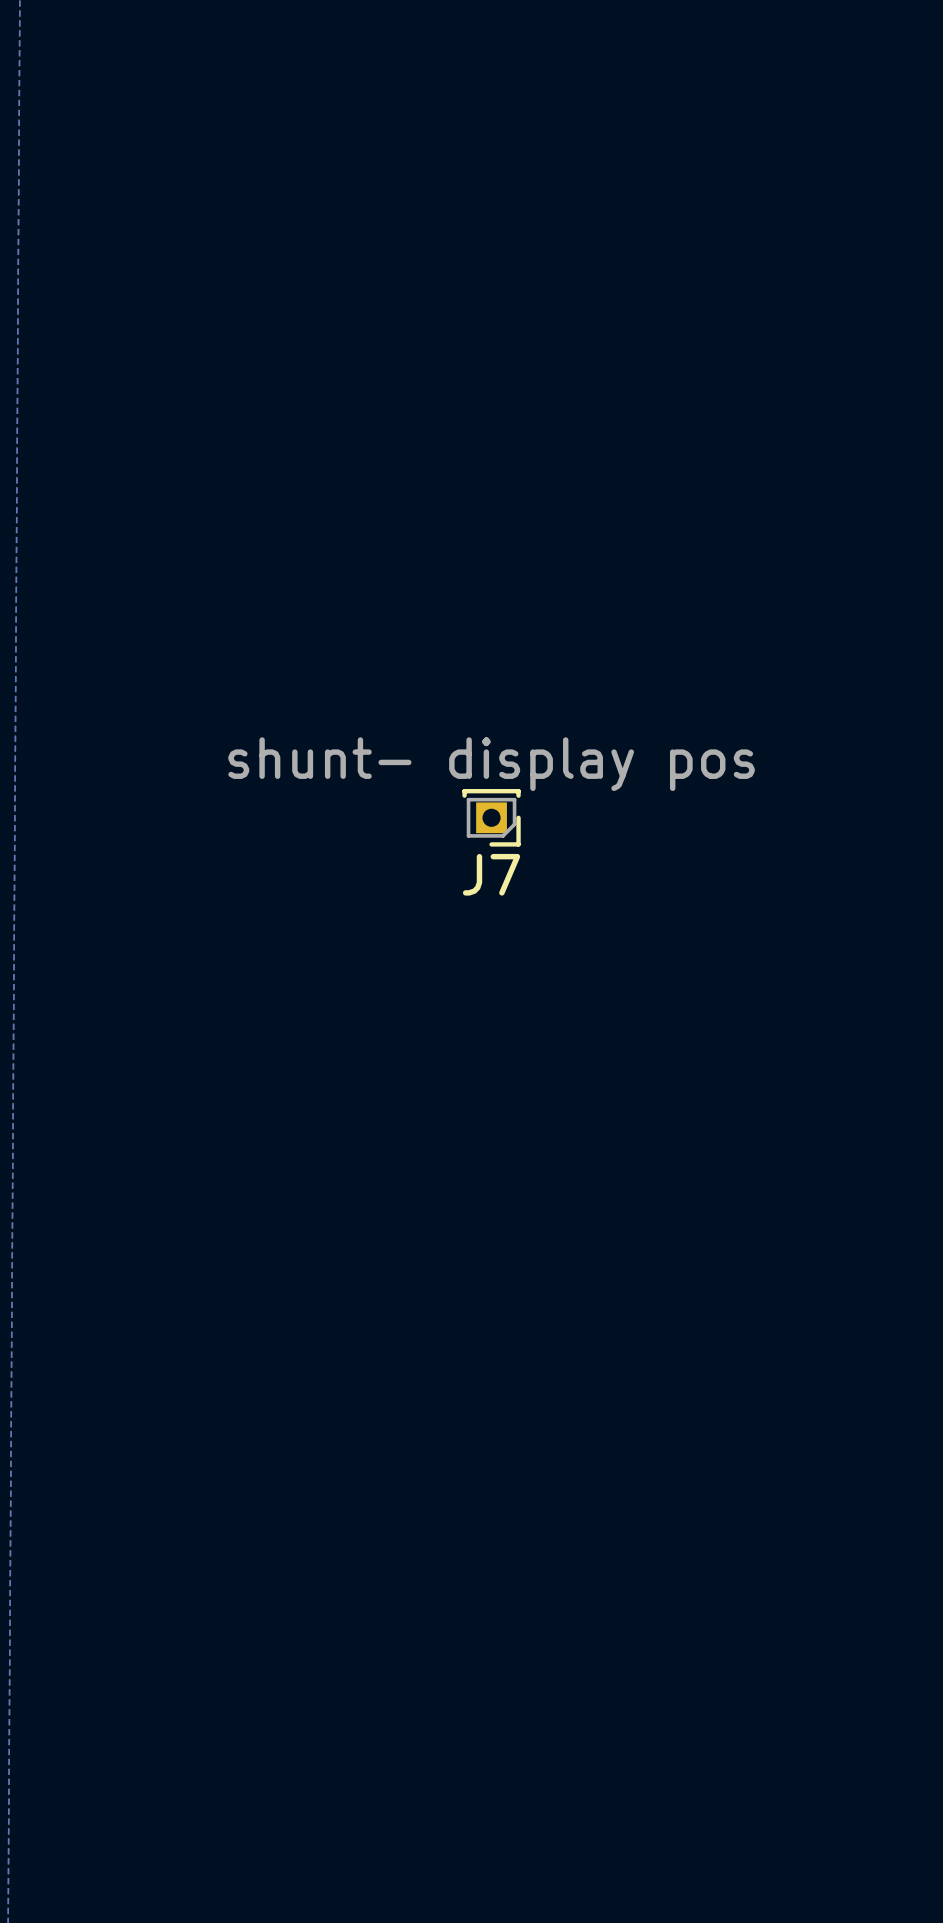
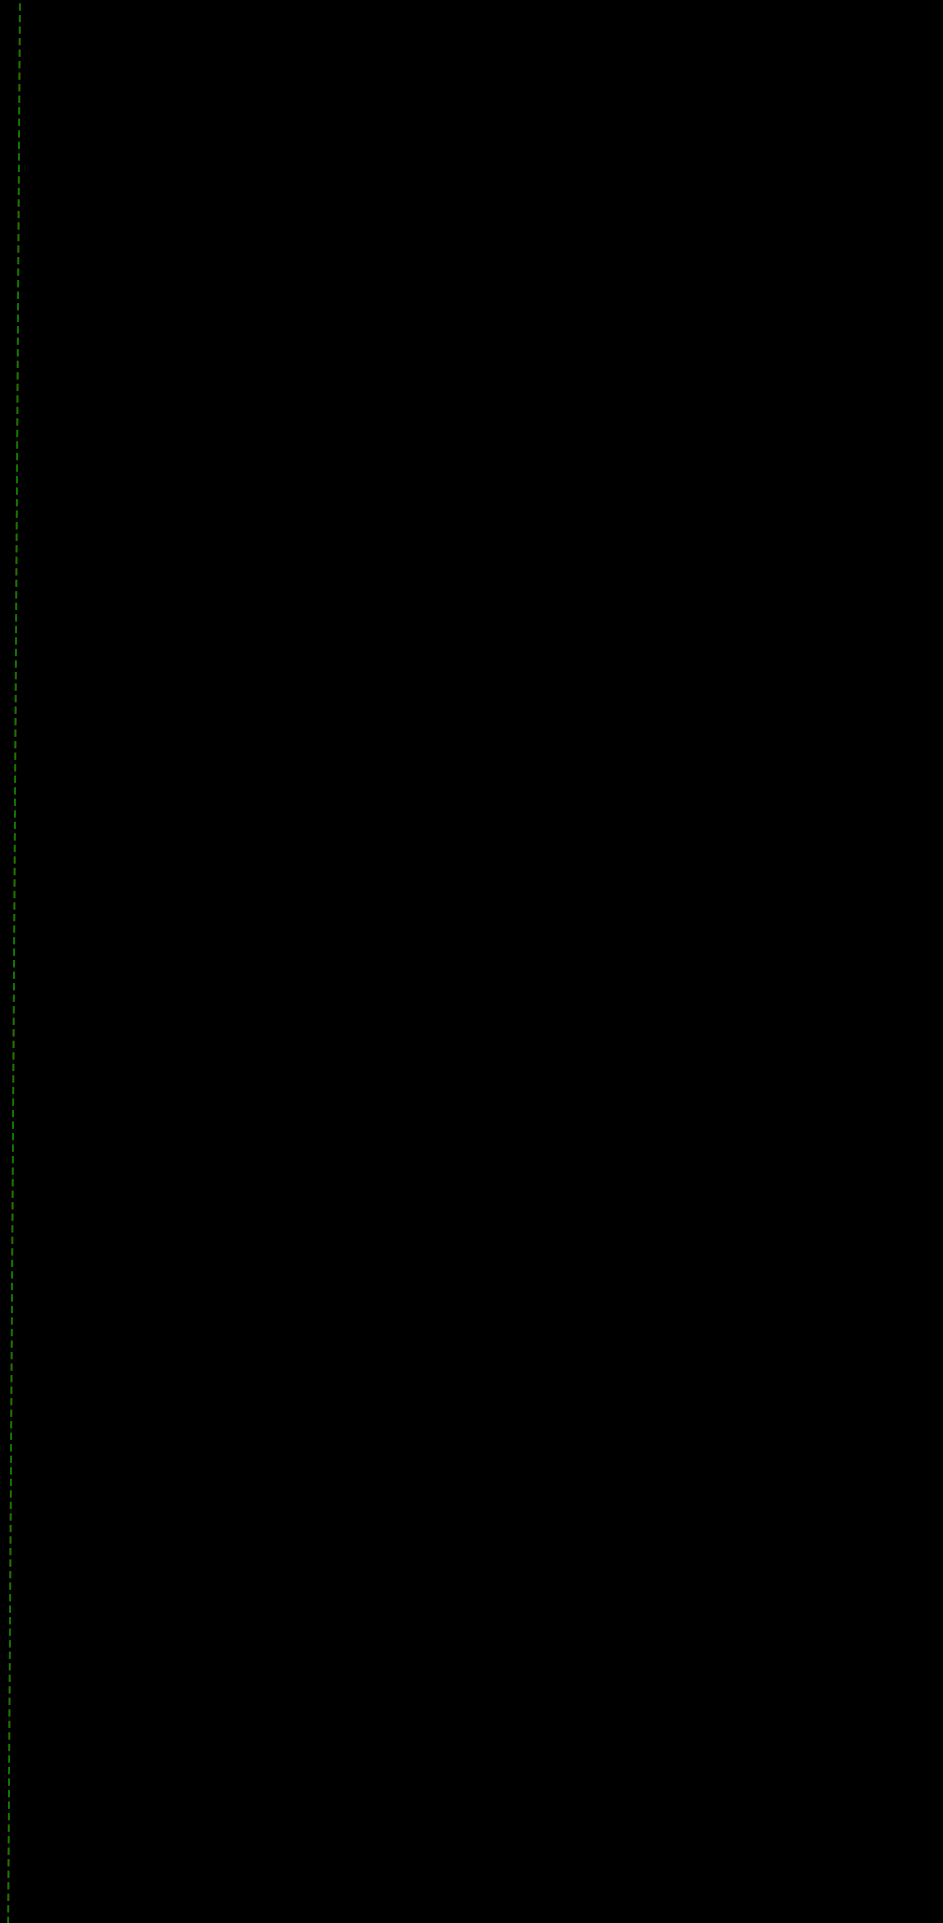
J7: shunt- display pos (491, 817) -> none

